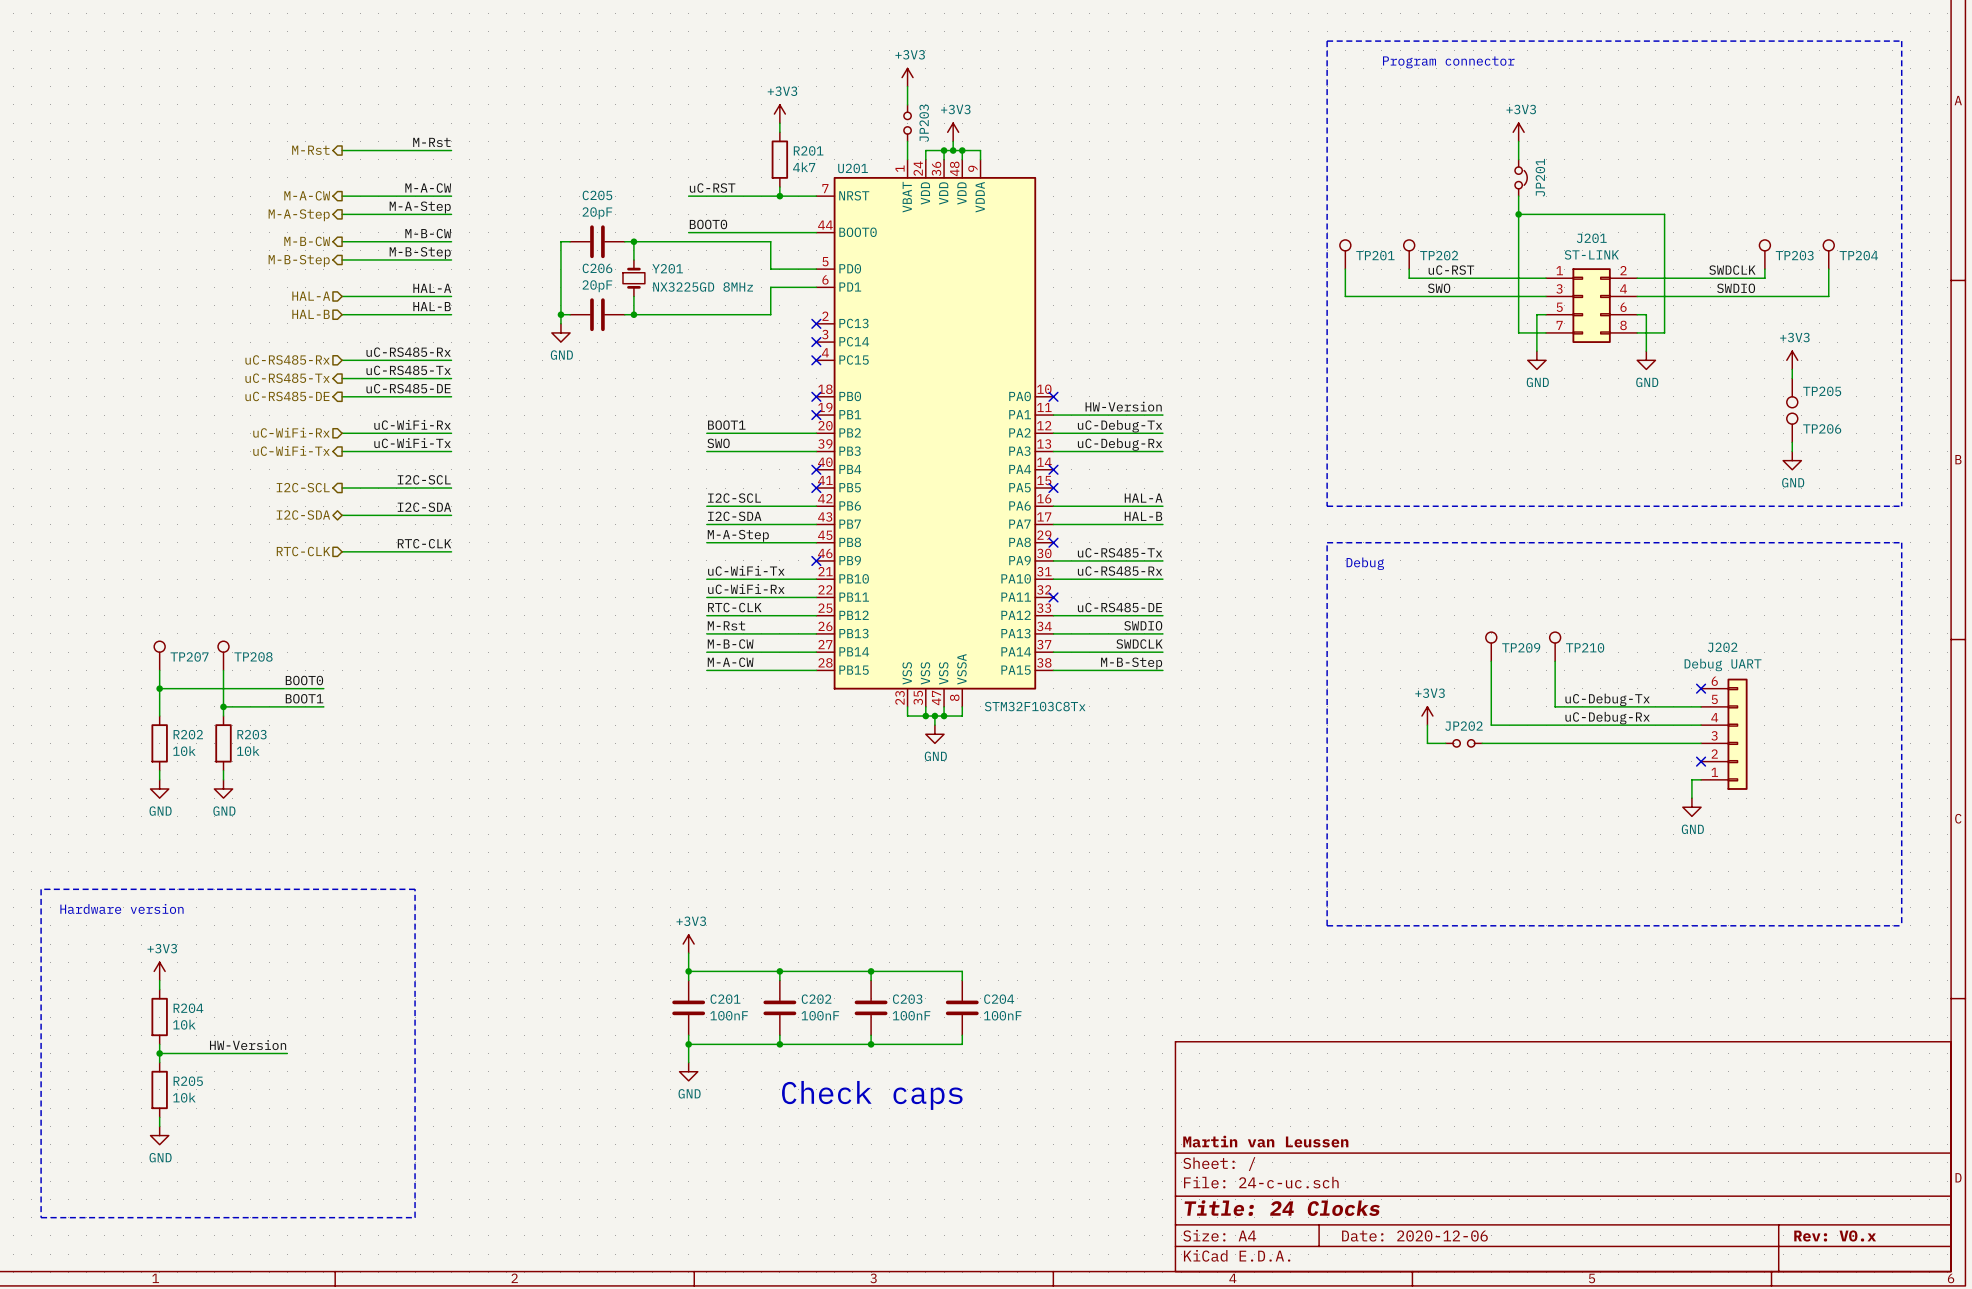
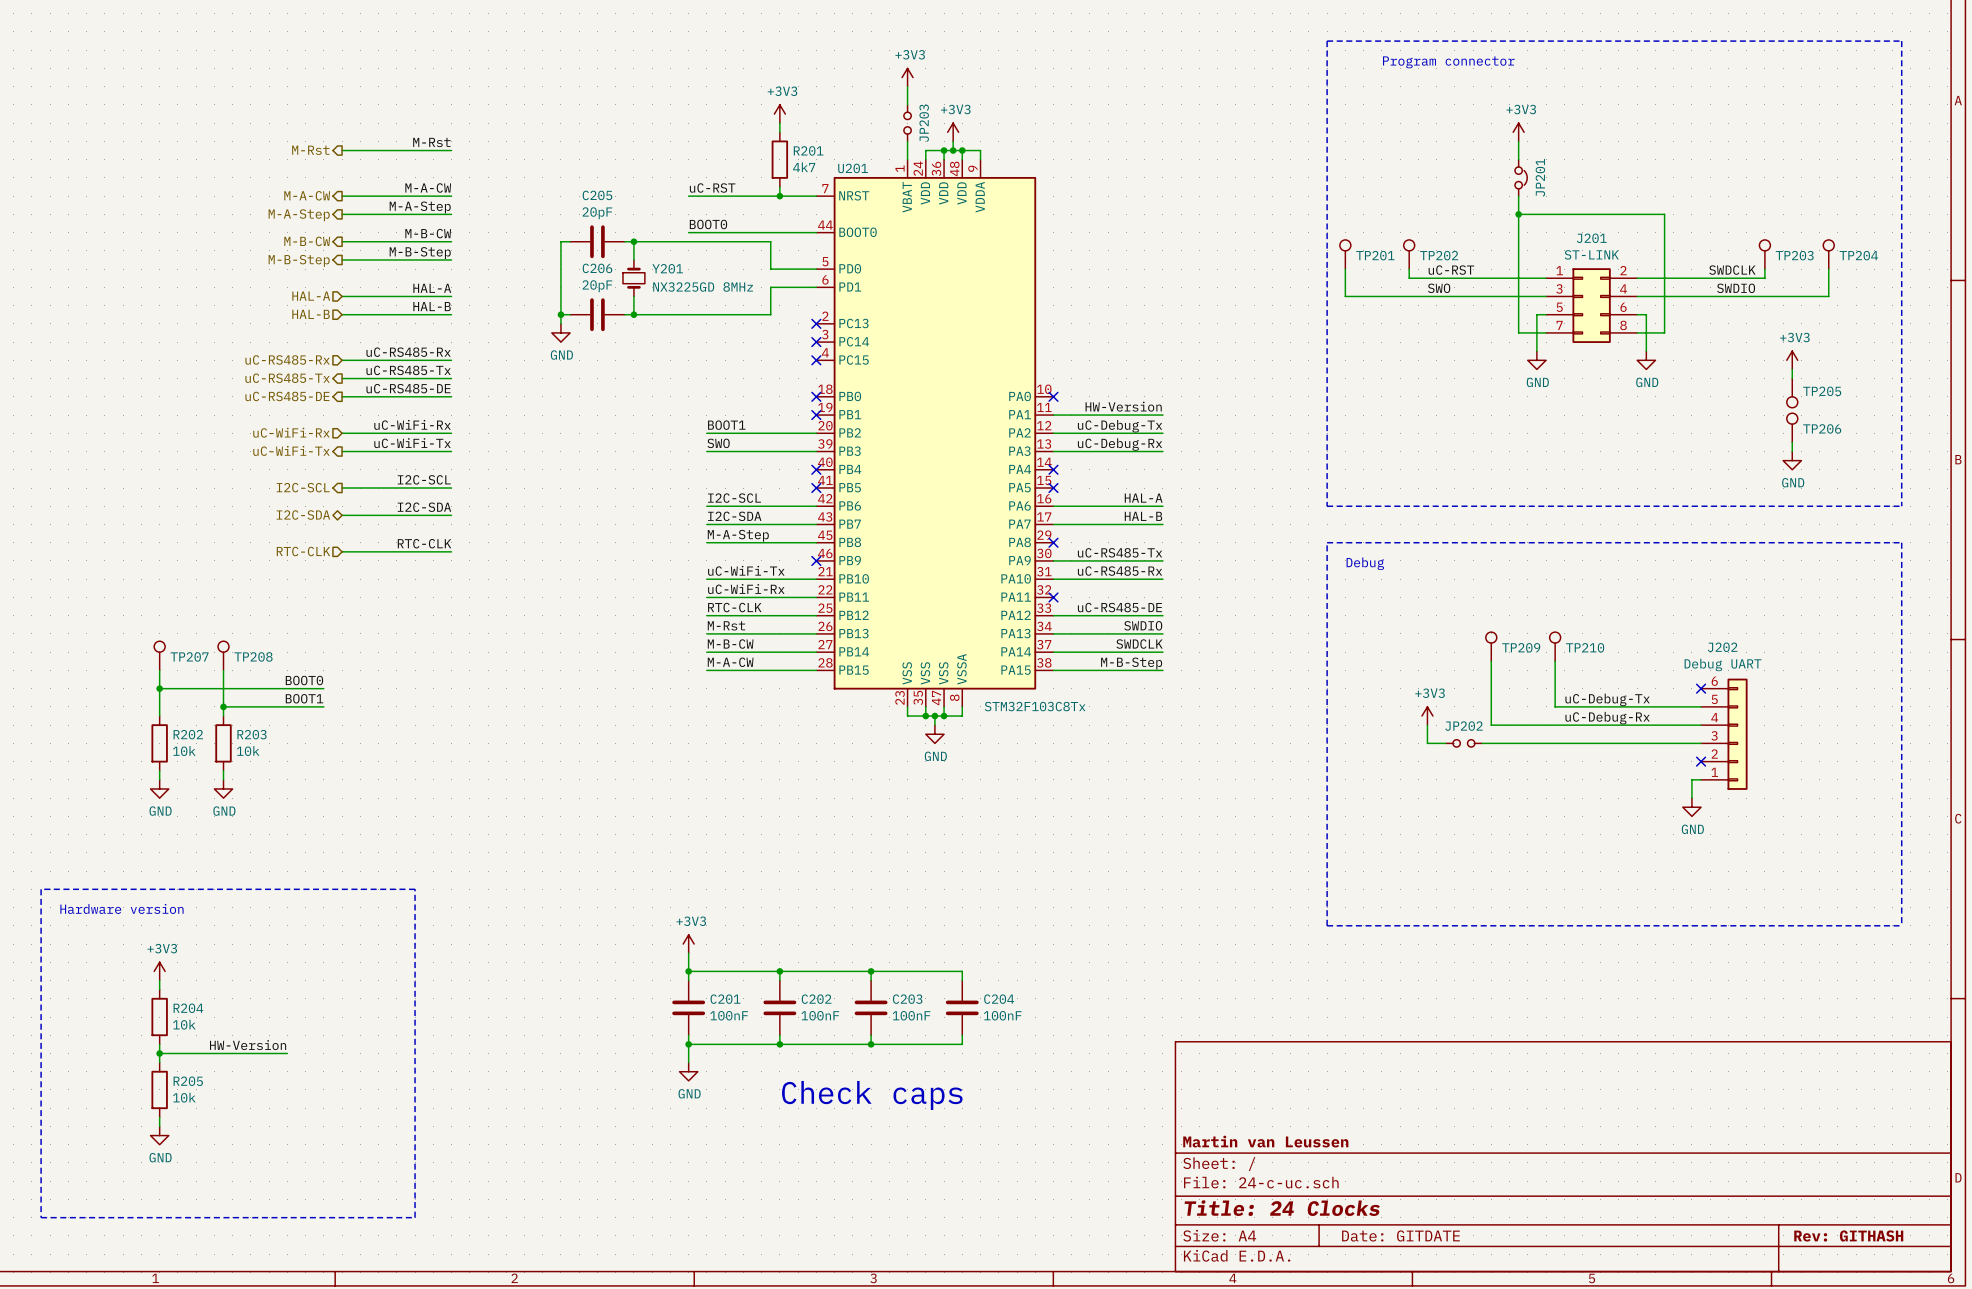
title block: Date: 2020-12-06 (1414, 1235) -> Date: GITDATE (1400, 1235)
title block: Rev: V0.x (1835, 1235) -> Rev: GITHASH (1848, 1235)

